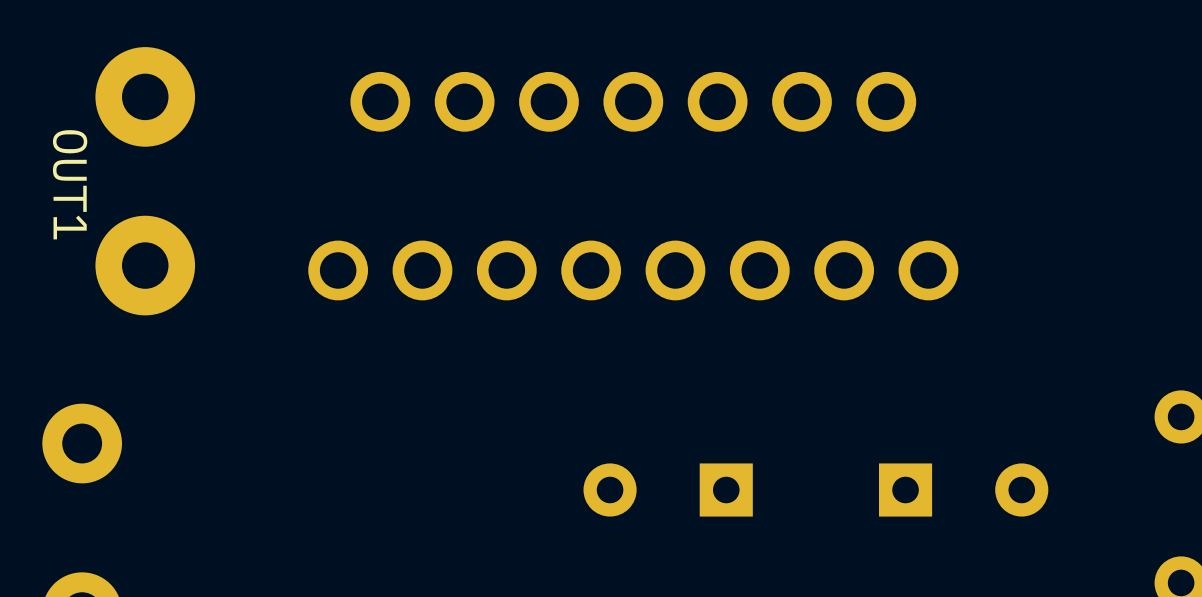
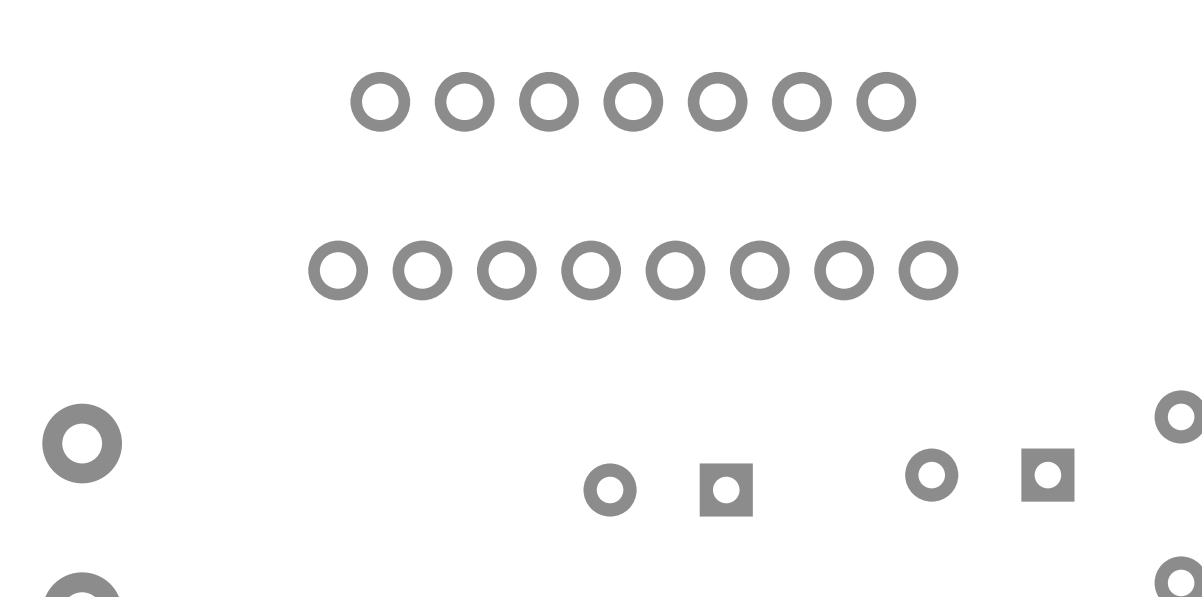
part: (145, 181) -> none
text: OUT1 (70, 184) -> none
part rotation: 0° (963, 490) -> 180° (989, 475)

